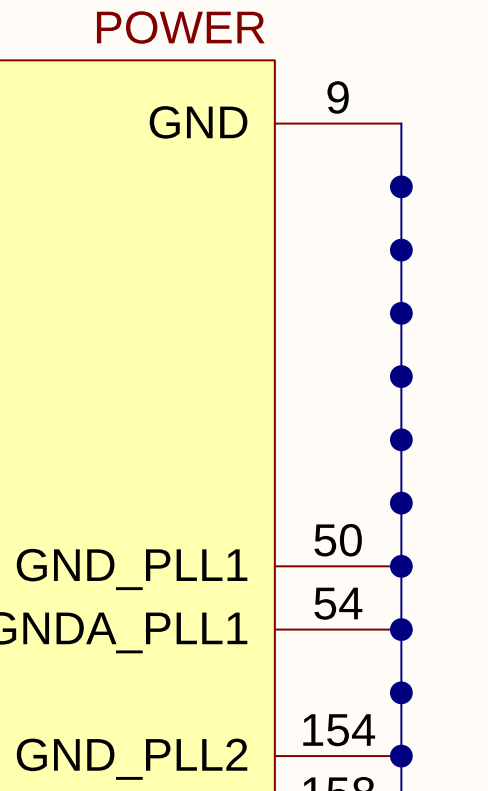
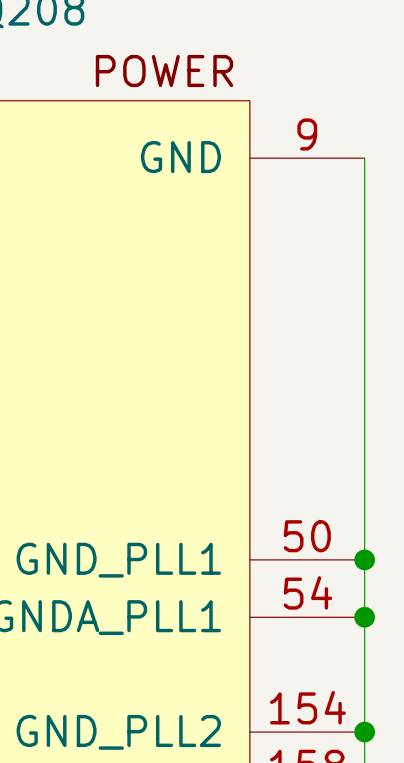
junction: (401, 186) -> none
junction: (401, 250) -> none
junction: (401, 313) -> none
junction: (401, 376) -> none
junction: (401, 439) -> none
junction: (401, 503) -> none
junction: (401, 692) -> none

